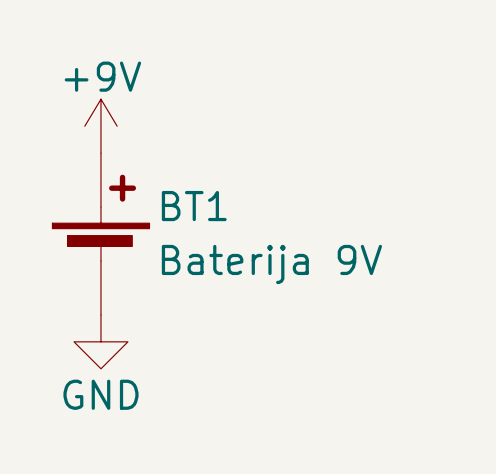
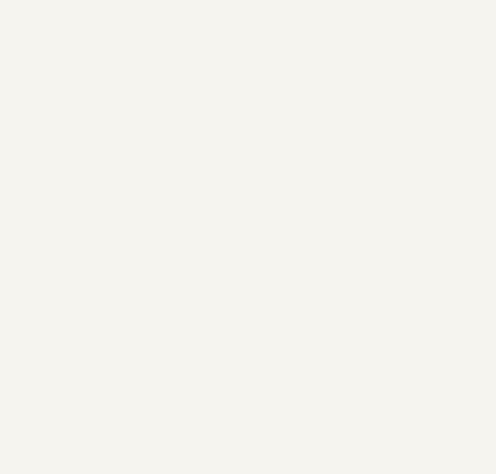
power symbol: +9V (100, 126) -> none
BT1: Baterija 9V (100, 234) -> none
power symbol: GND (100, 341) -> none

